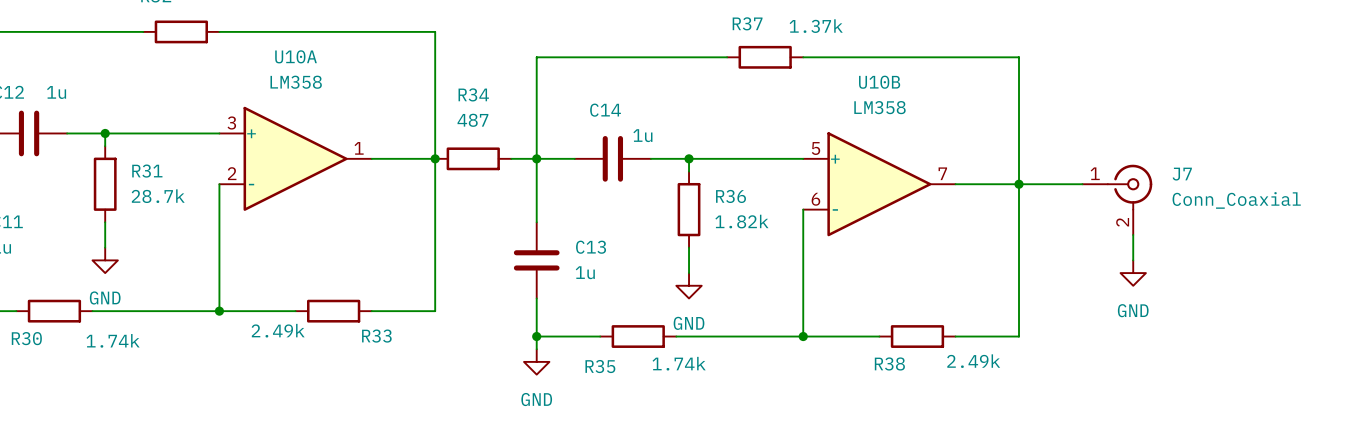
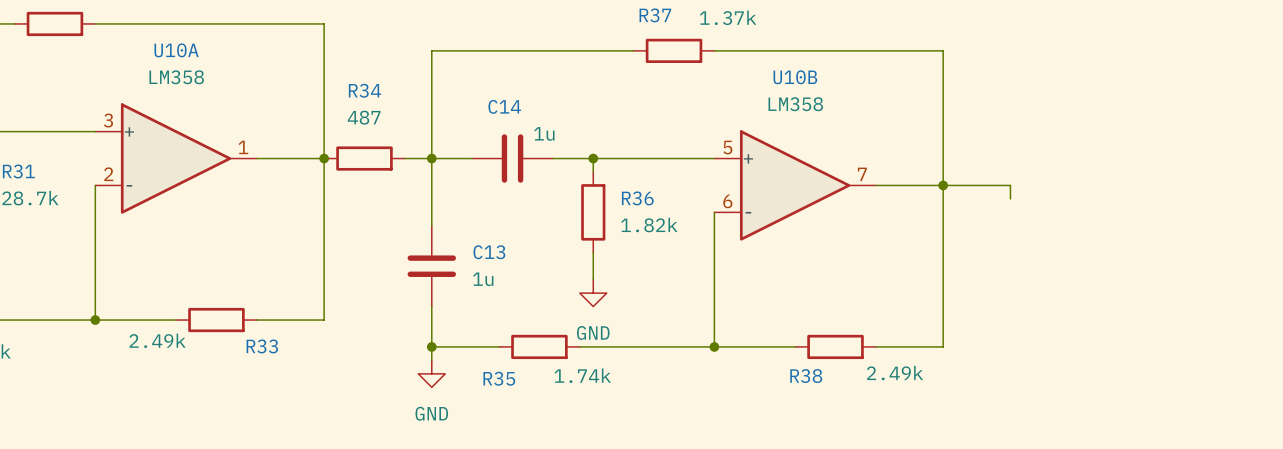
wire: none -> (1010, 185) (1010, 198)
J7: Conn_Coaxial (1117, 199) -> none
wire: (1133, 235) (1133, 260) -> none
power symbol: GND (1133, 273) -> none

